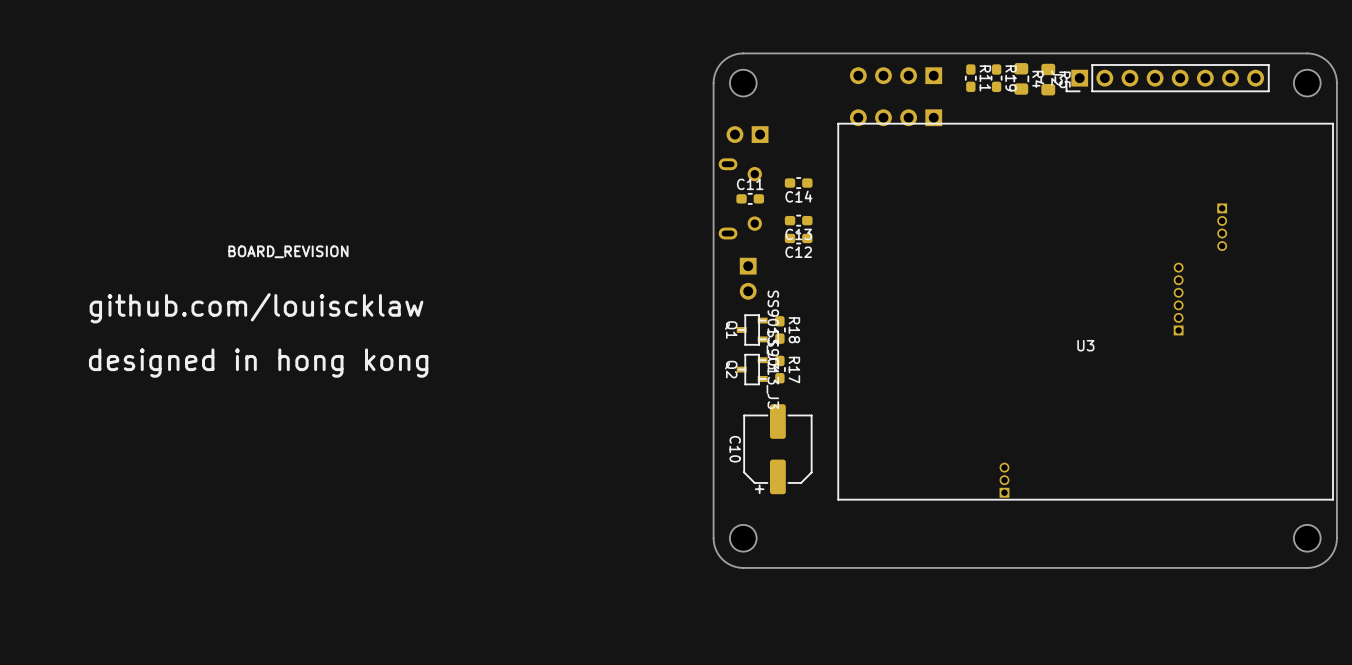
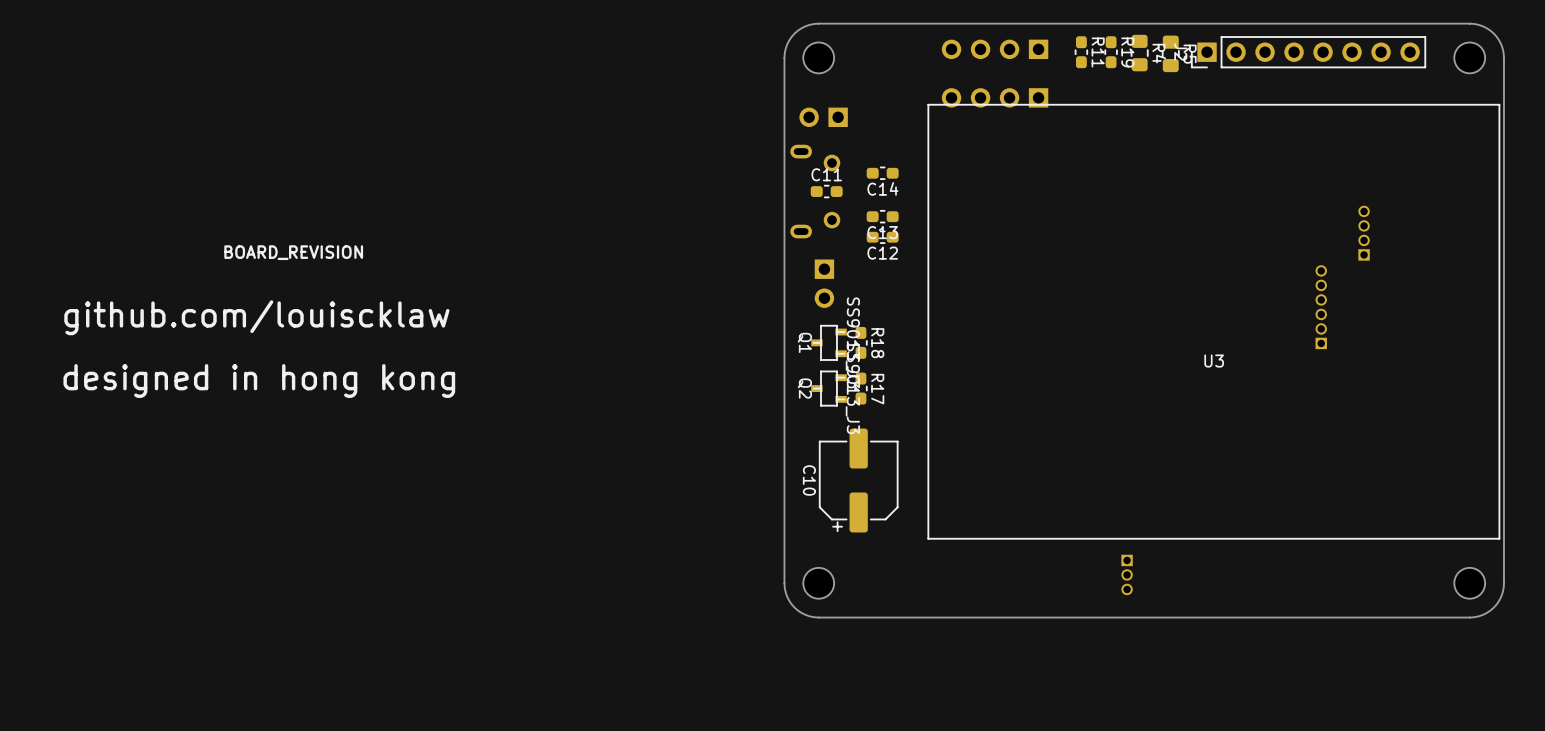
part rotation: 0° (1222, 227) -> 180° (1364, 233)
part rotation: 0° (1004, 480) -> 180° (1127, 574)
part position: (1004, 480) -> (1127, 574)

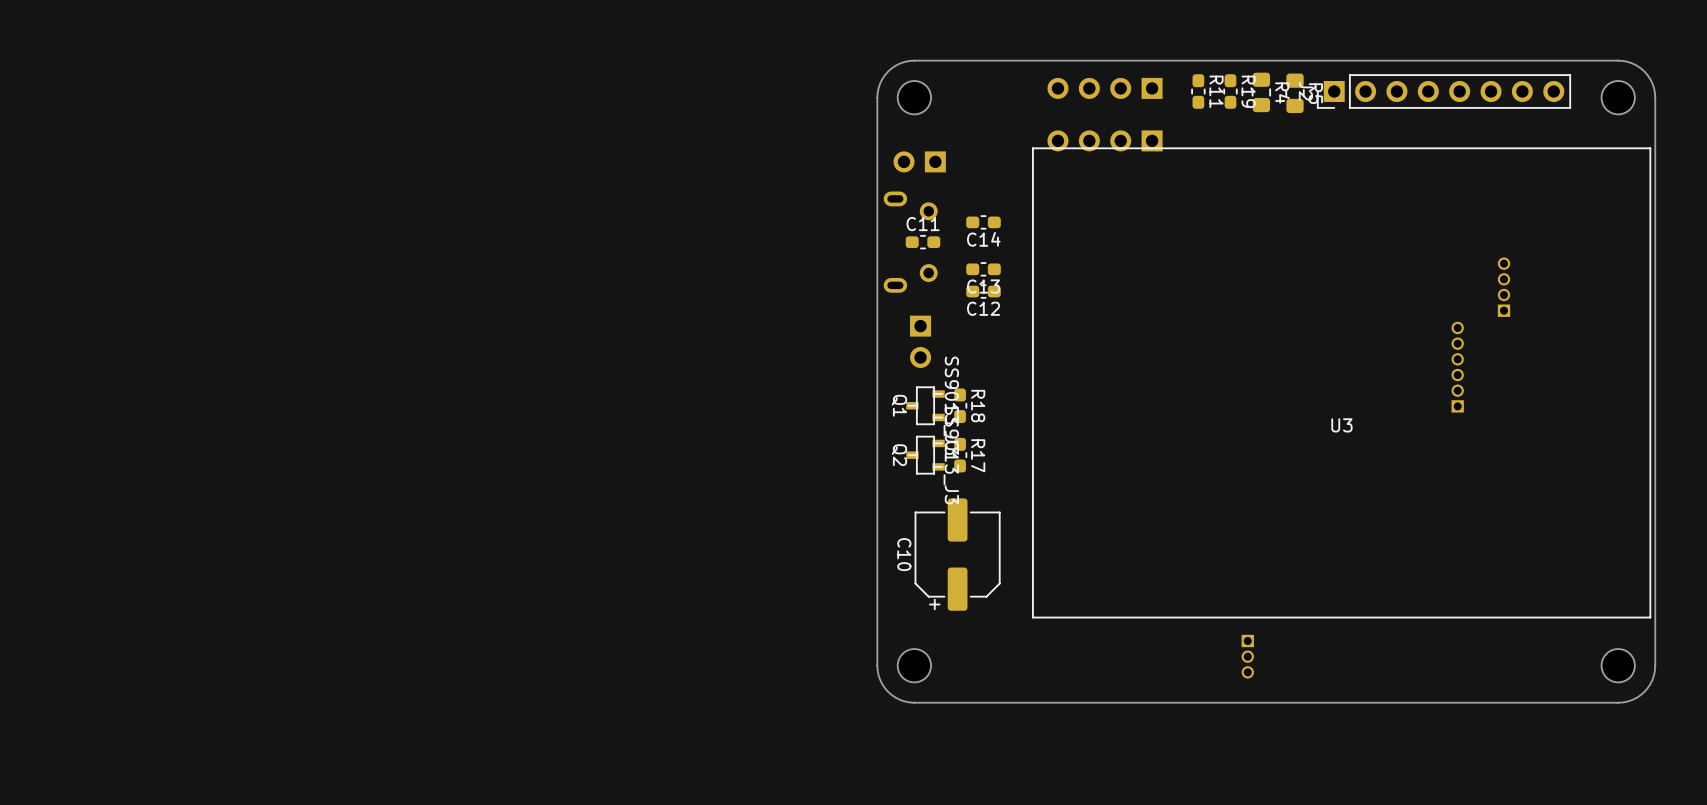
drawing: [224, 245, 364, 261] -> none
drawing: [64, 300, 450, 336] -> none
drawing: [63, 364, 456, 398] -> none

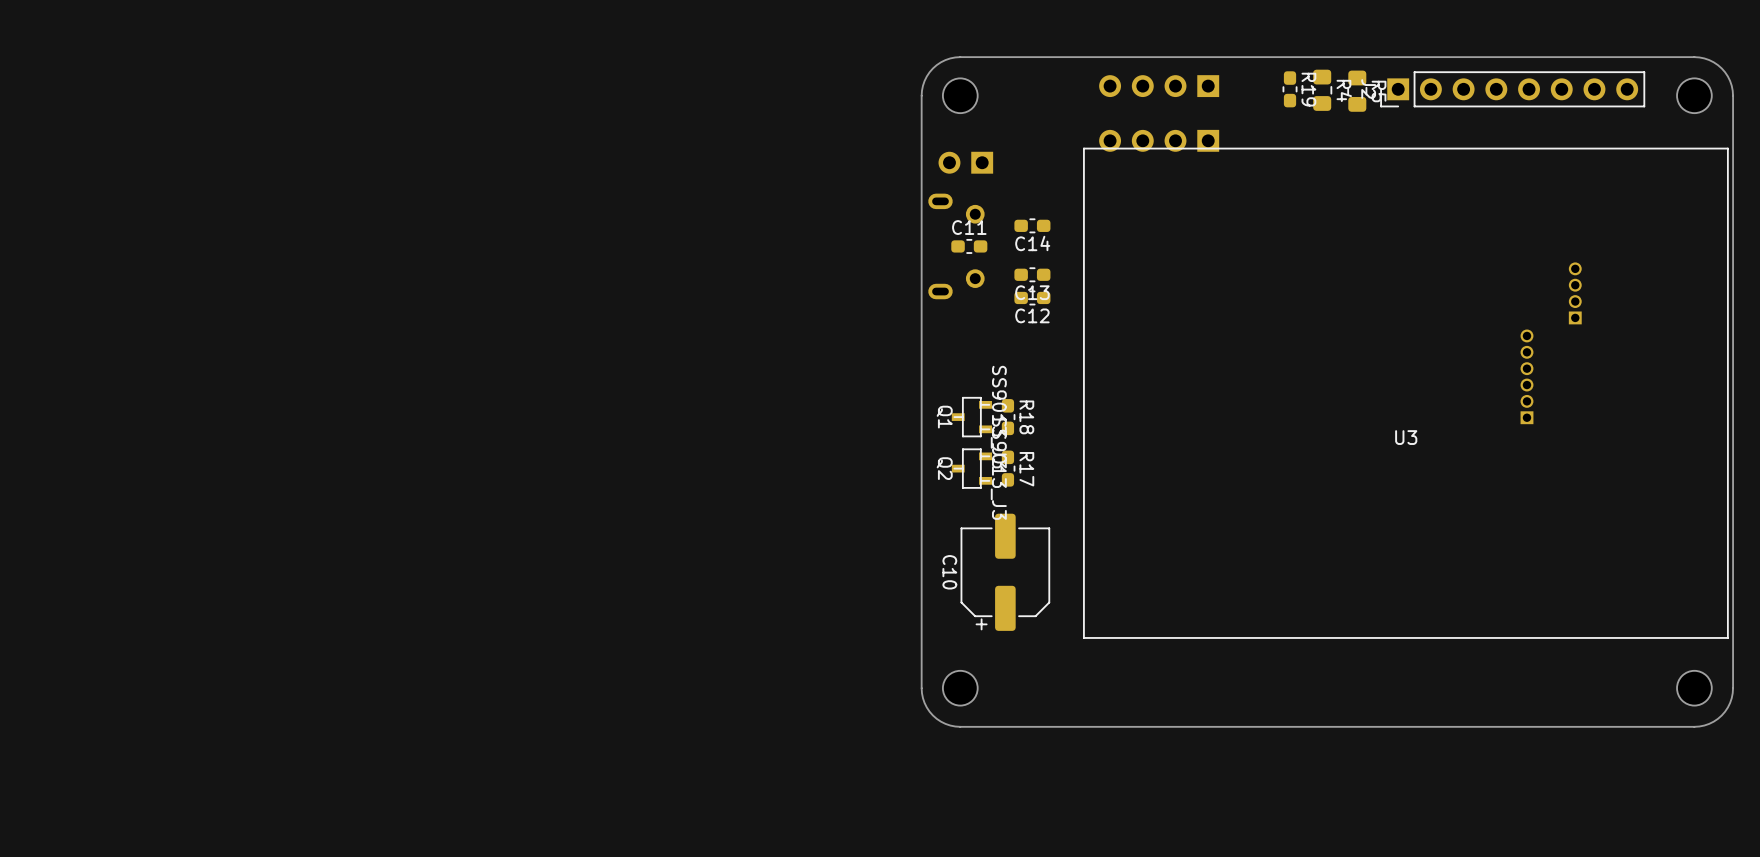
R11: (1198, 91) -> none
part: (920, 341) -> none
part: (1247, 656) -> none

